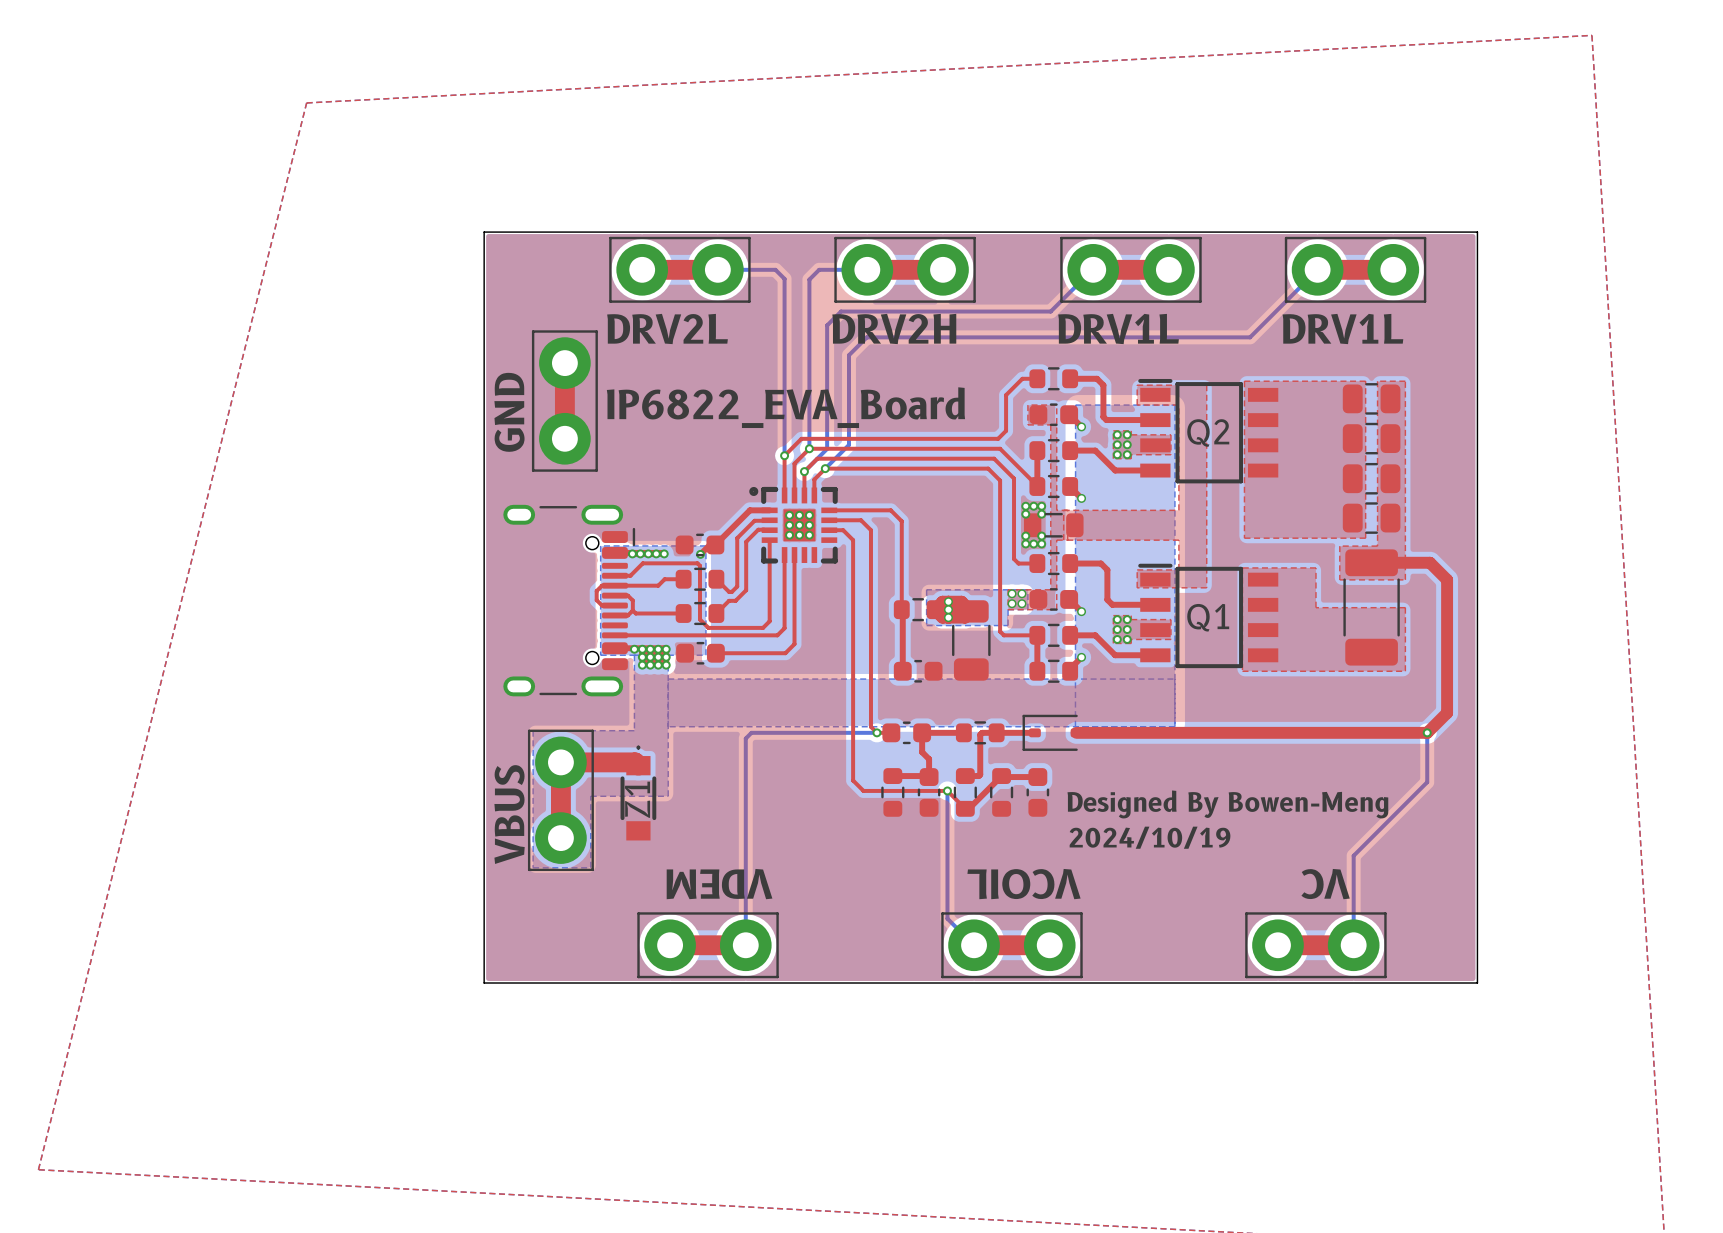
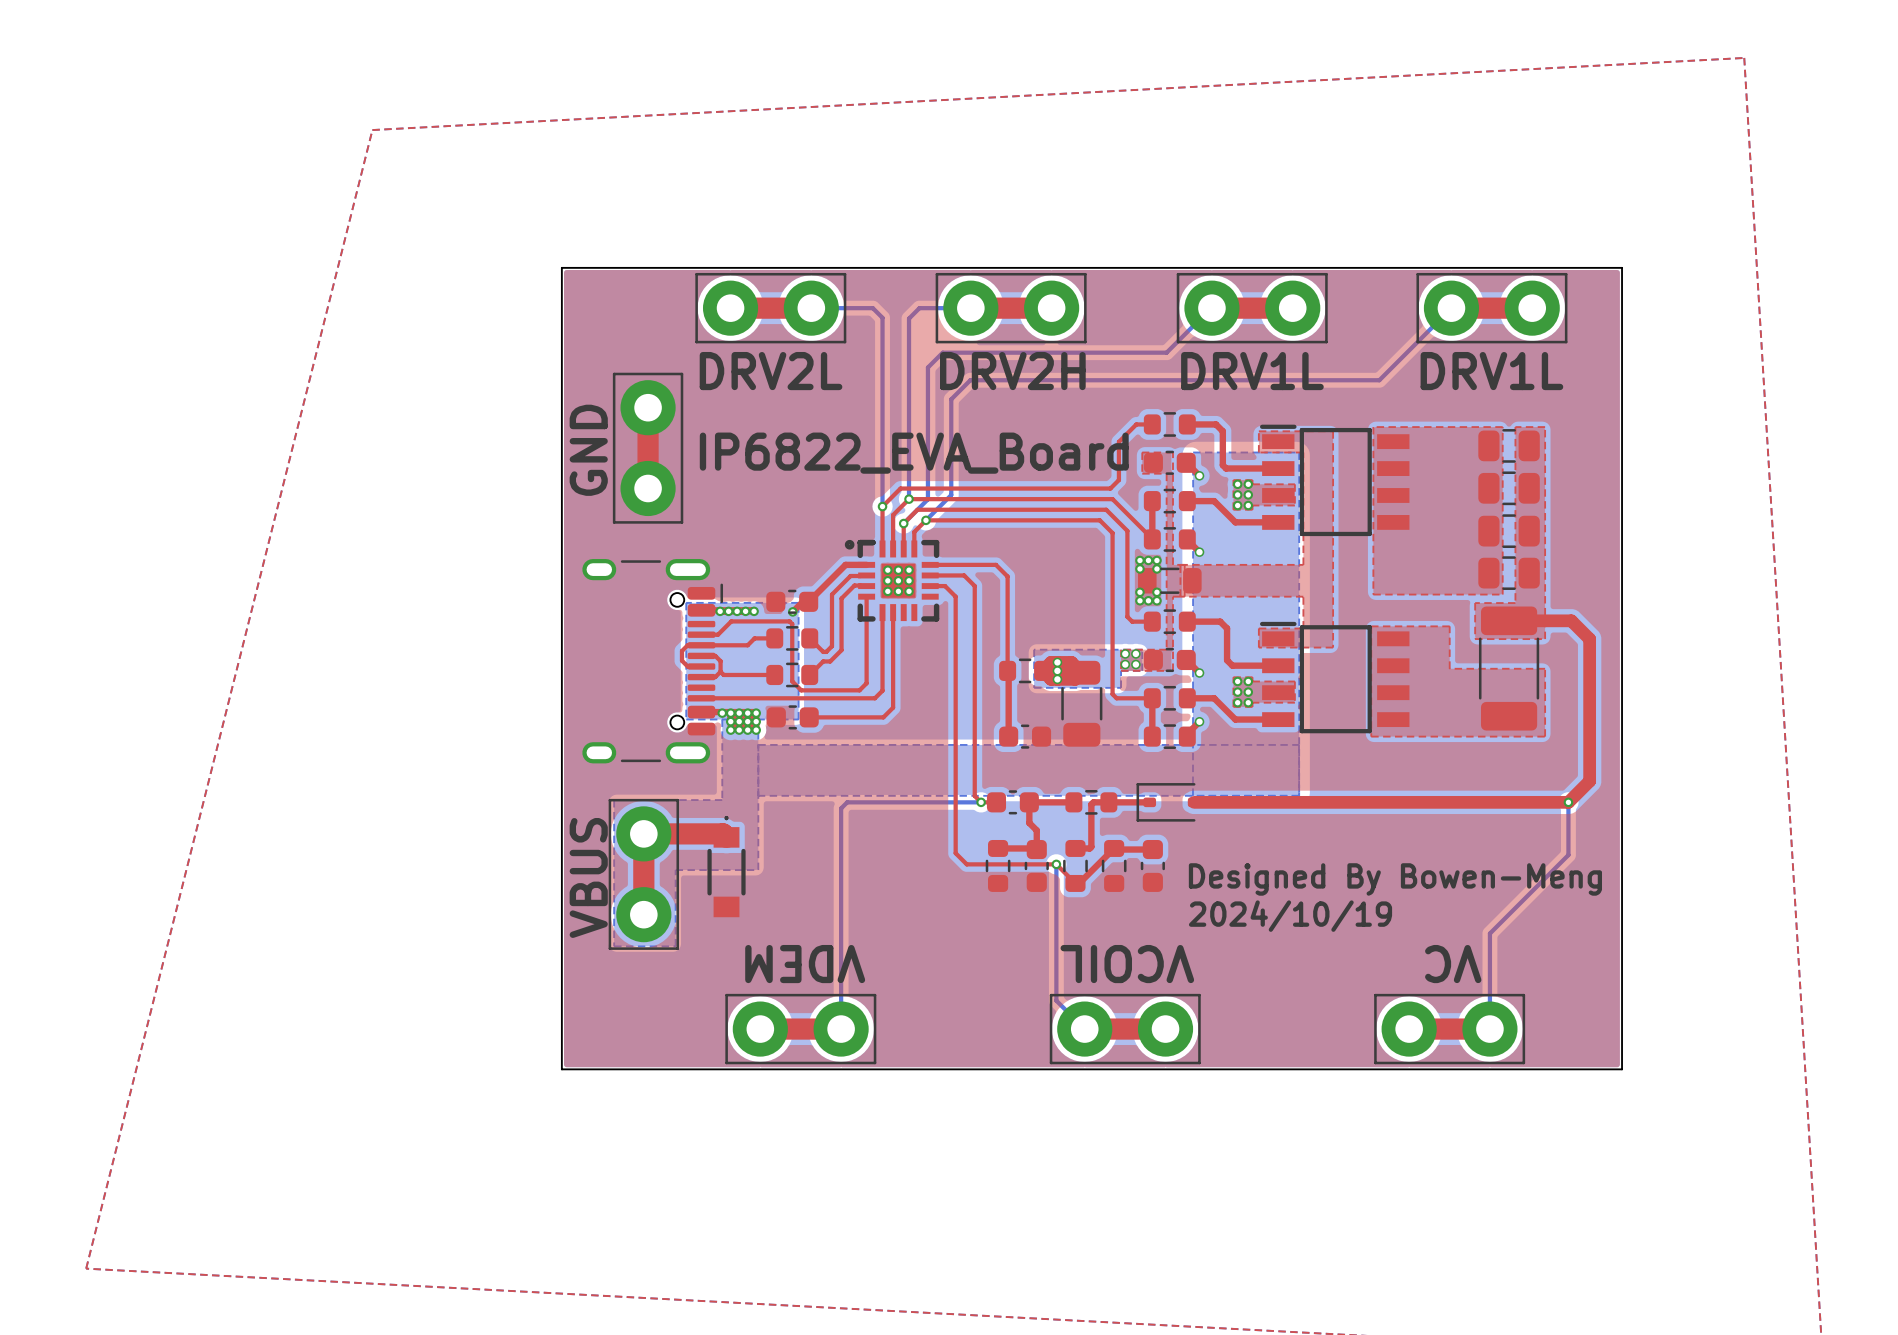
Q2 name: Q2 (1208, 433) -> none
Q1 name: Q1 (1208, 617) -> none
Z1 name: Z1 (637, 799) -> none

